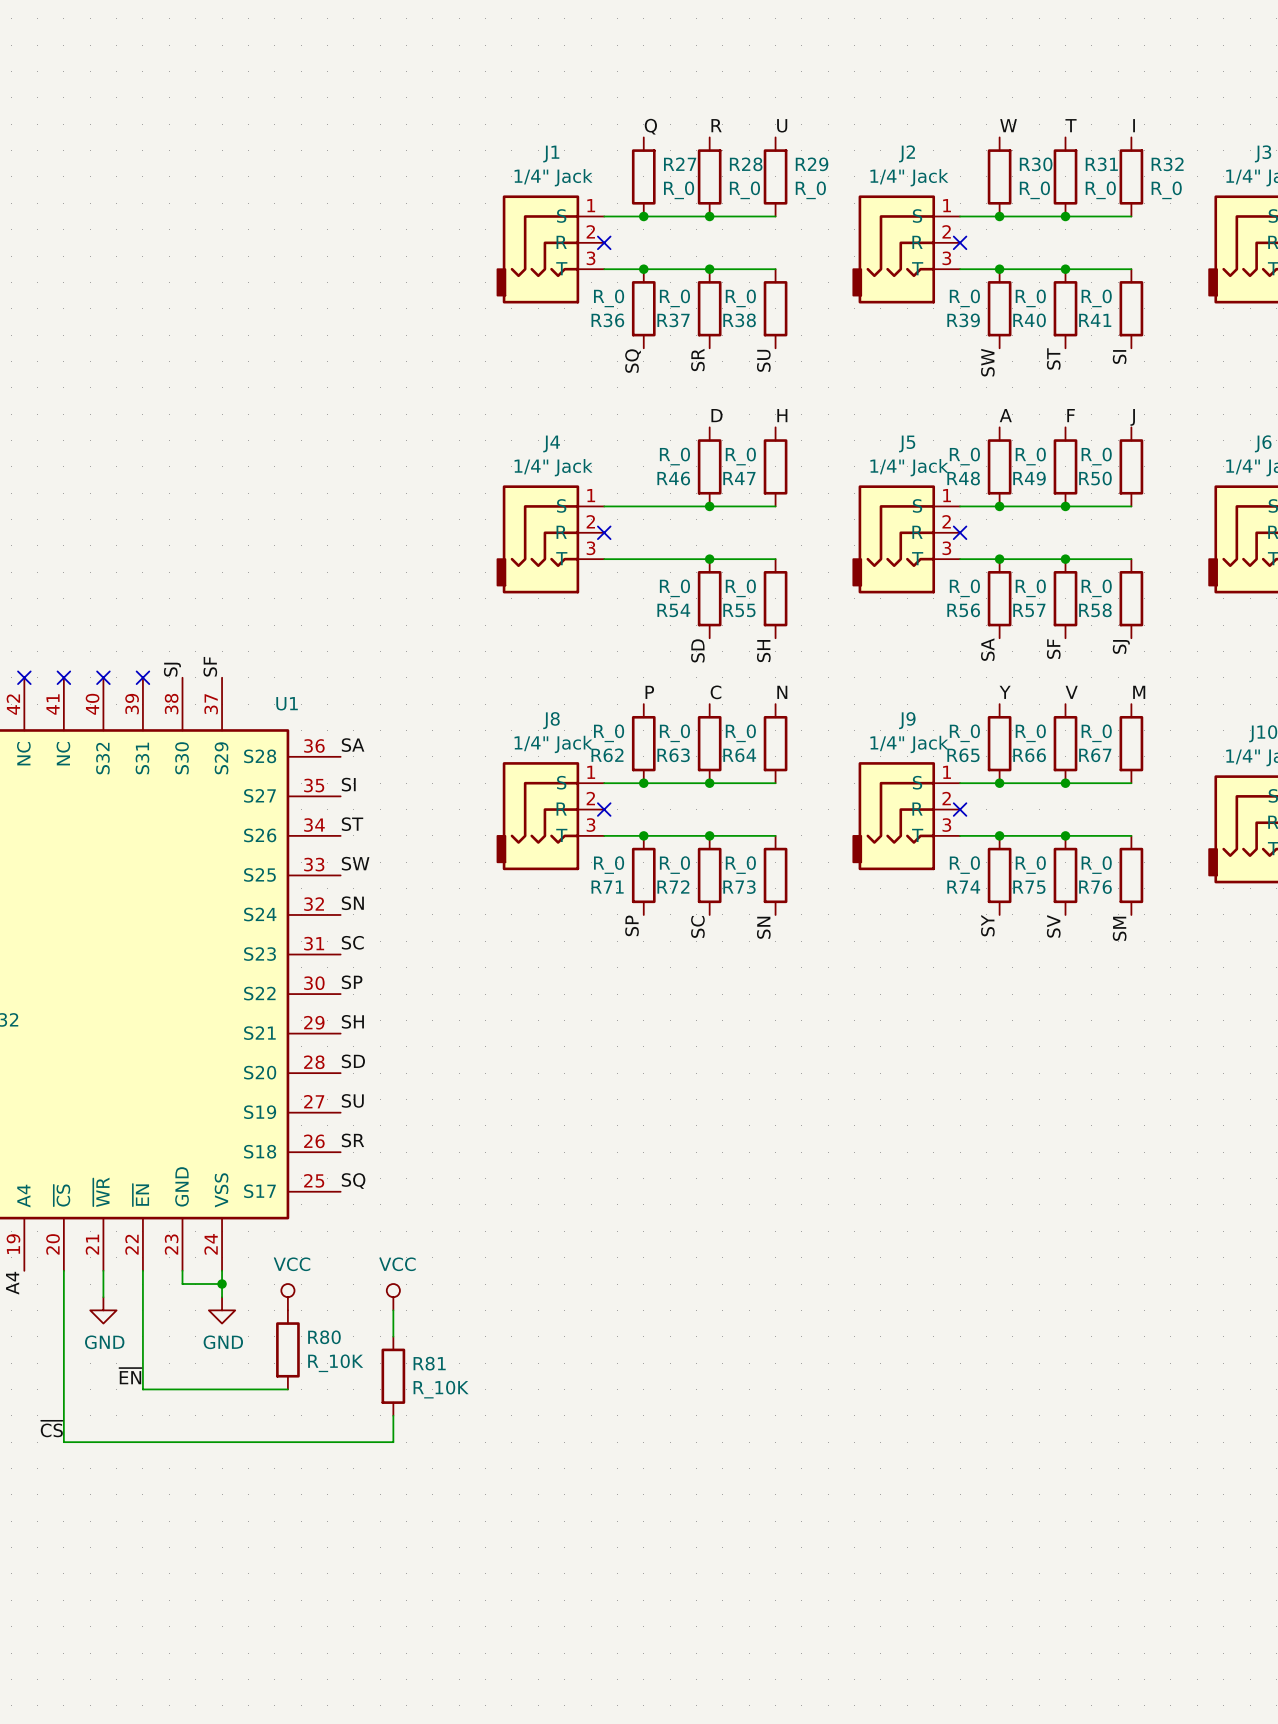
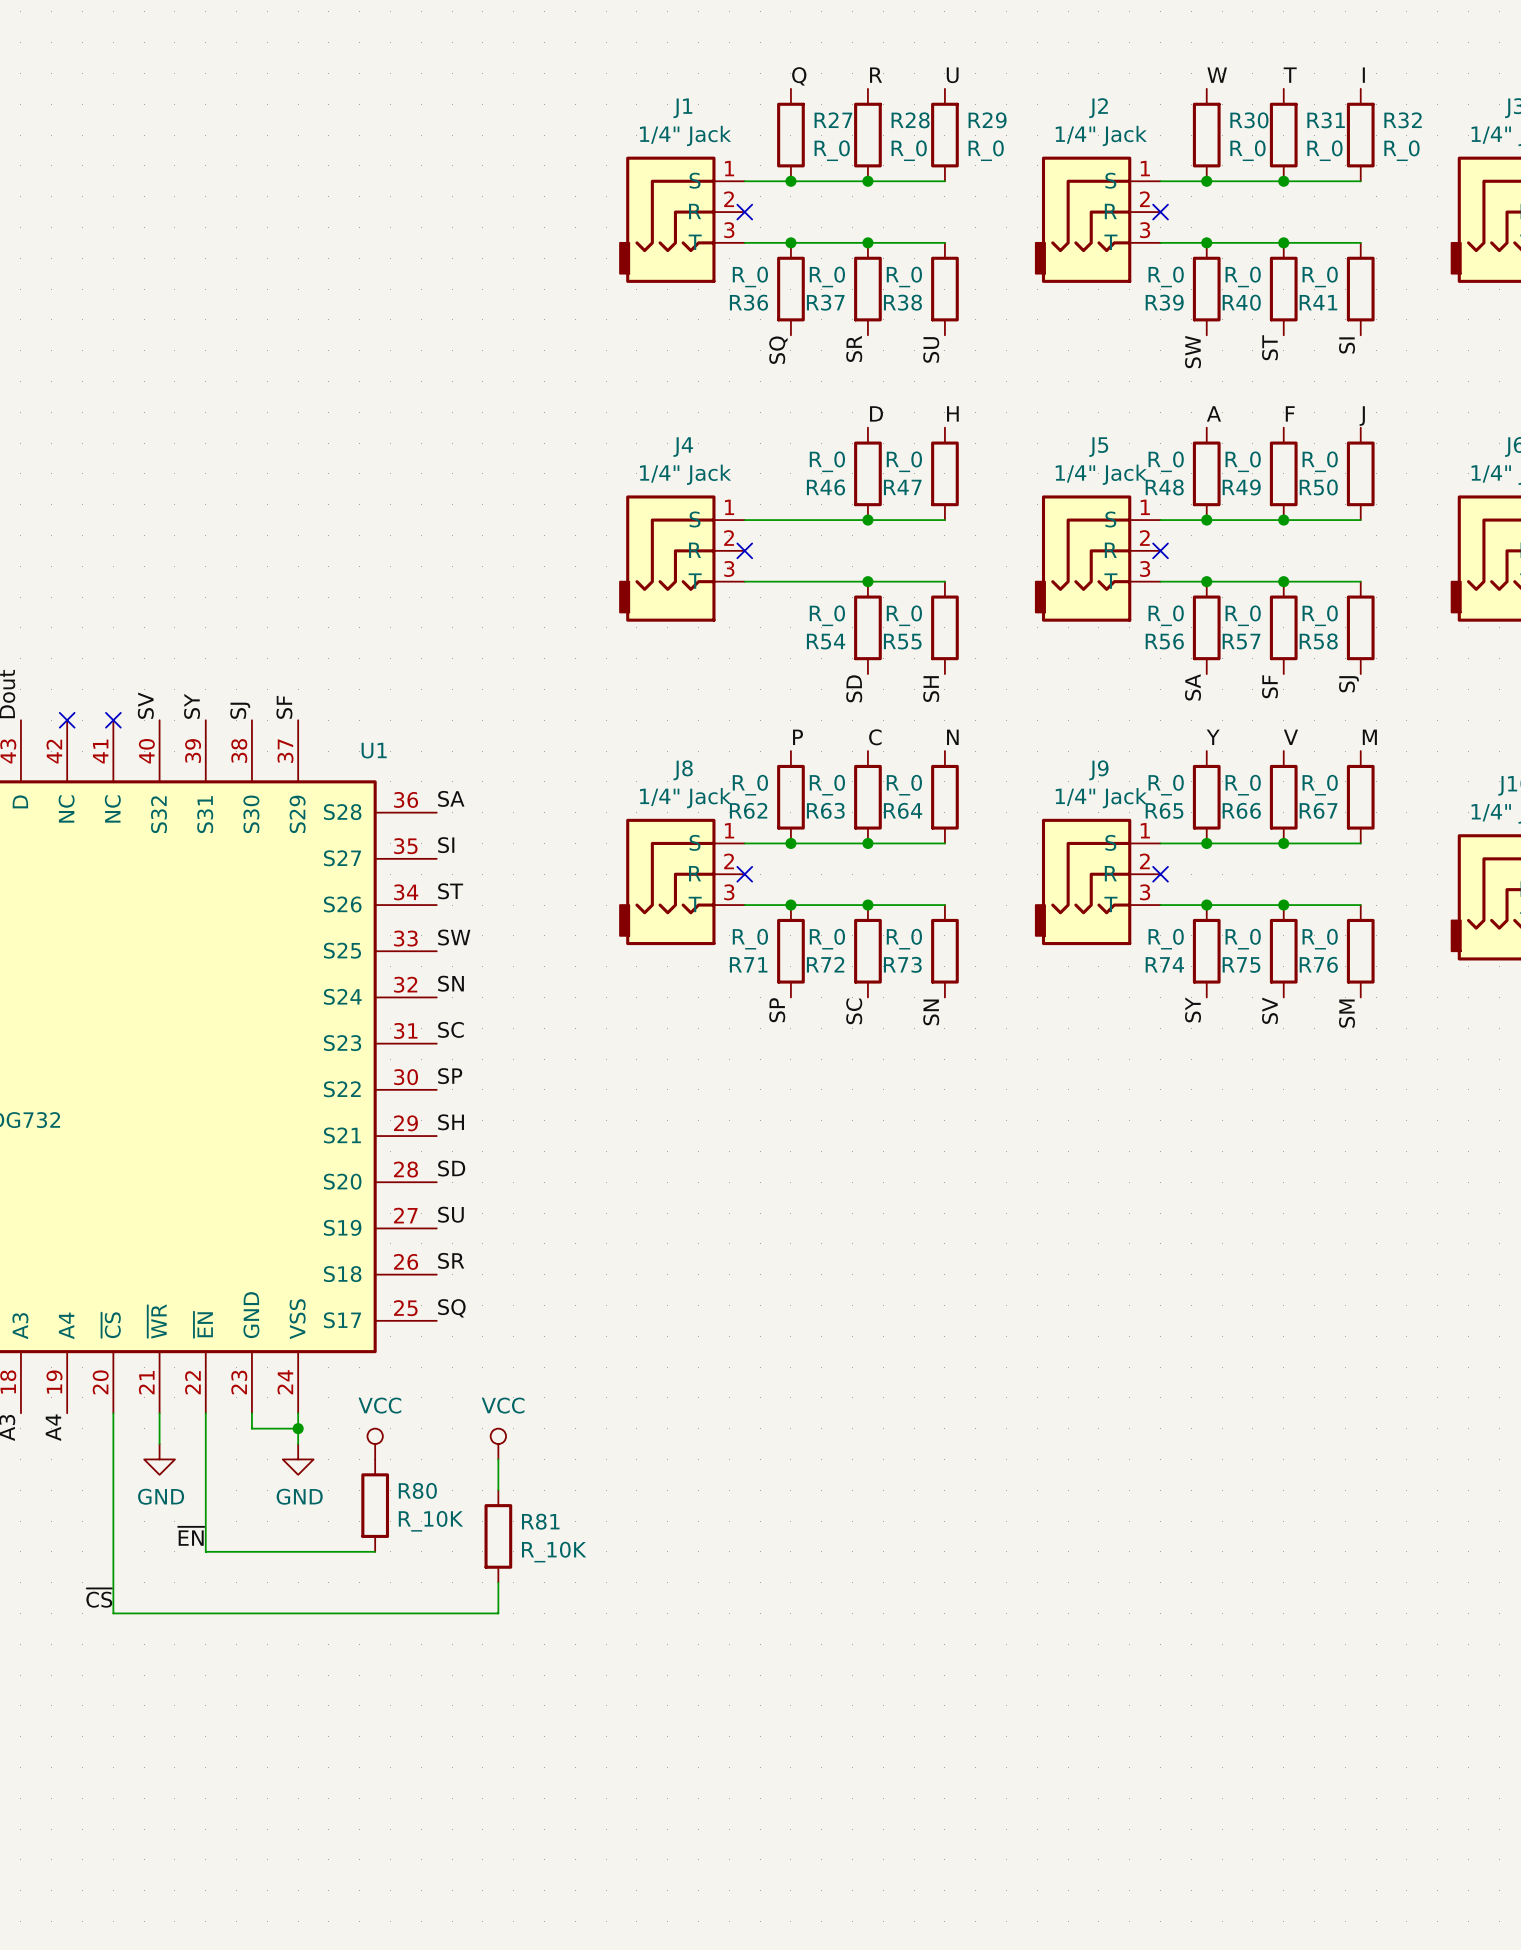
label: none -> SV (145, 705)
label: none -> SY (192, 706)
no-connect mark: (103, 677) -> none
no-connect mark: (142, 677) -> none

